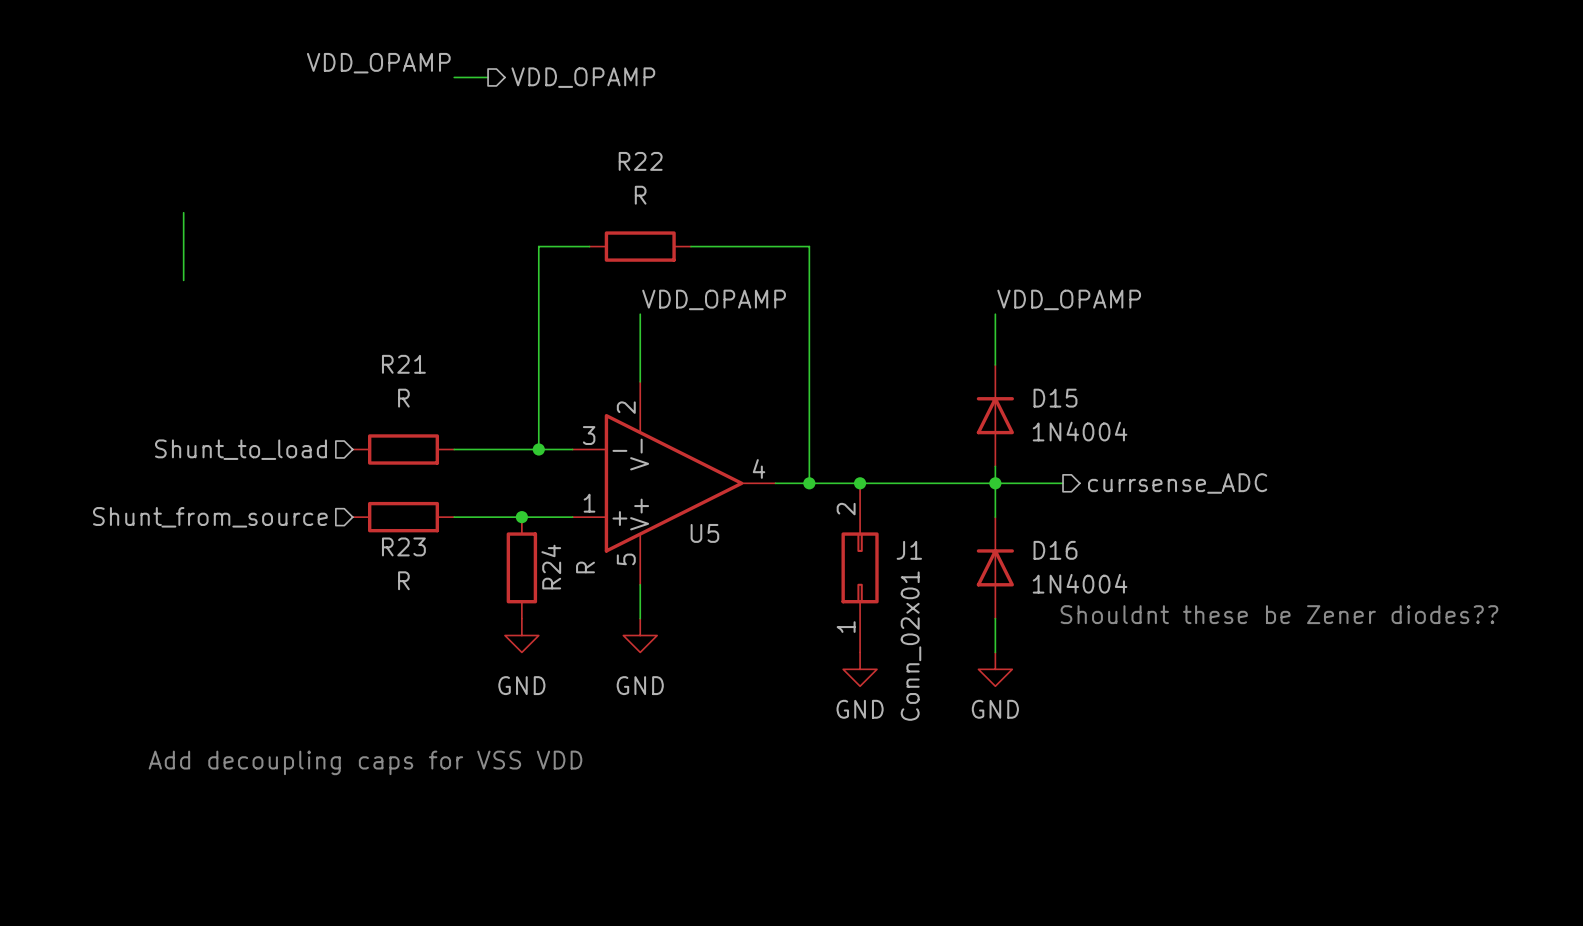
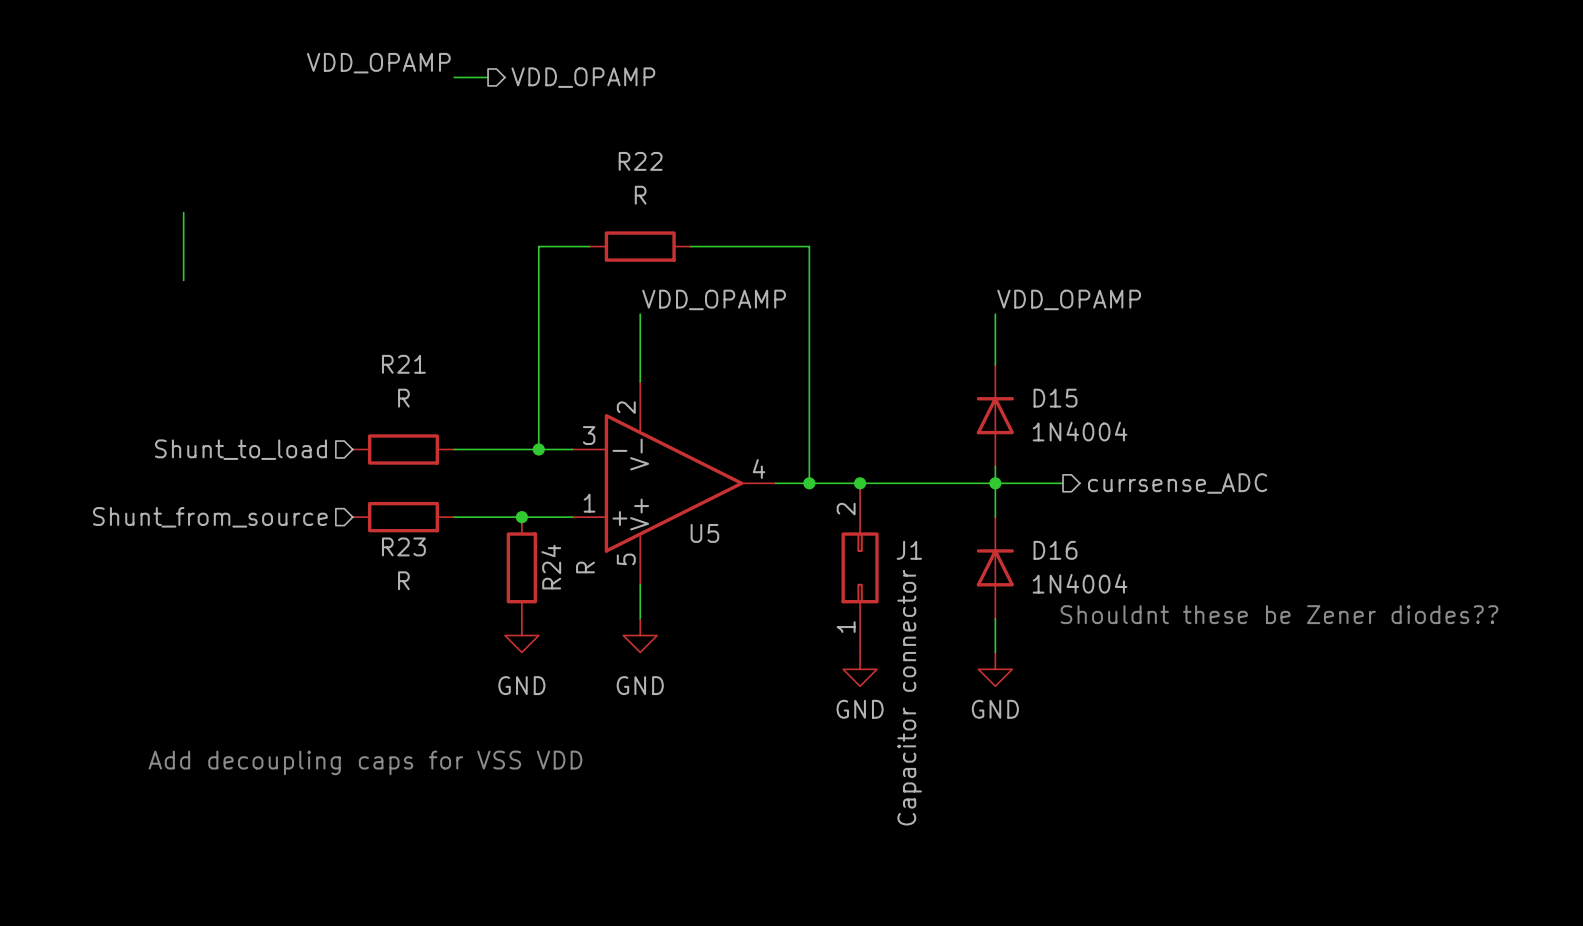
J1 value: Conn_02x01 (910, 646) -> Capacitor connector (909, 697)

